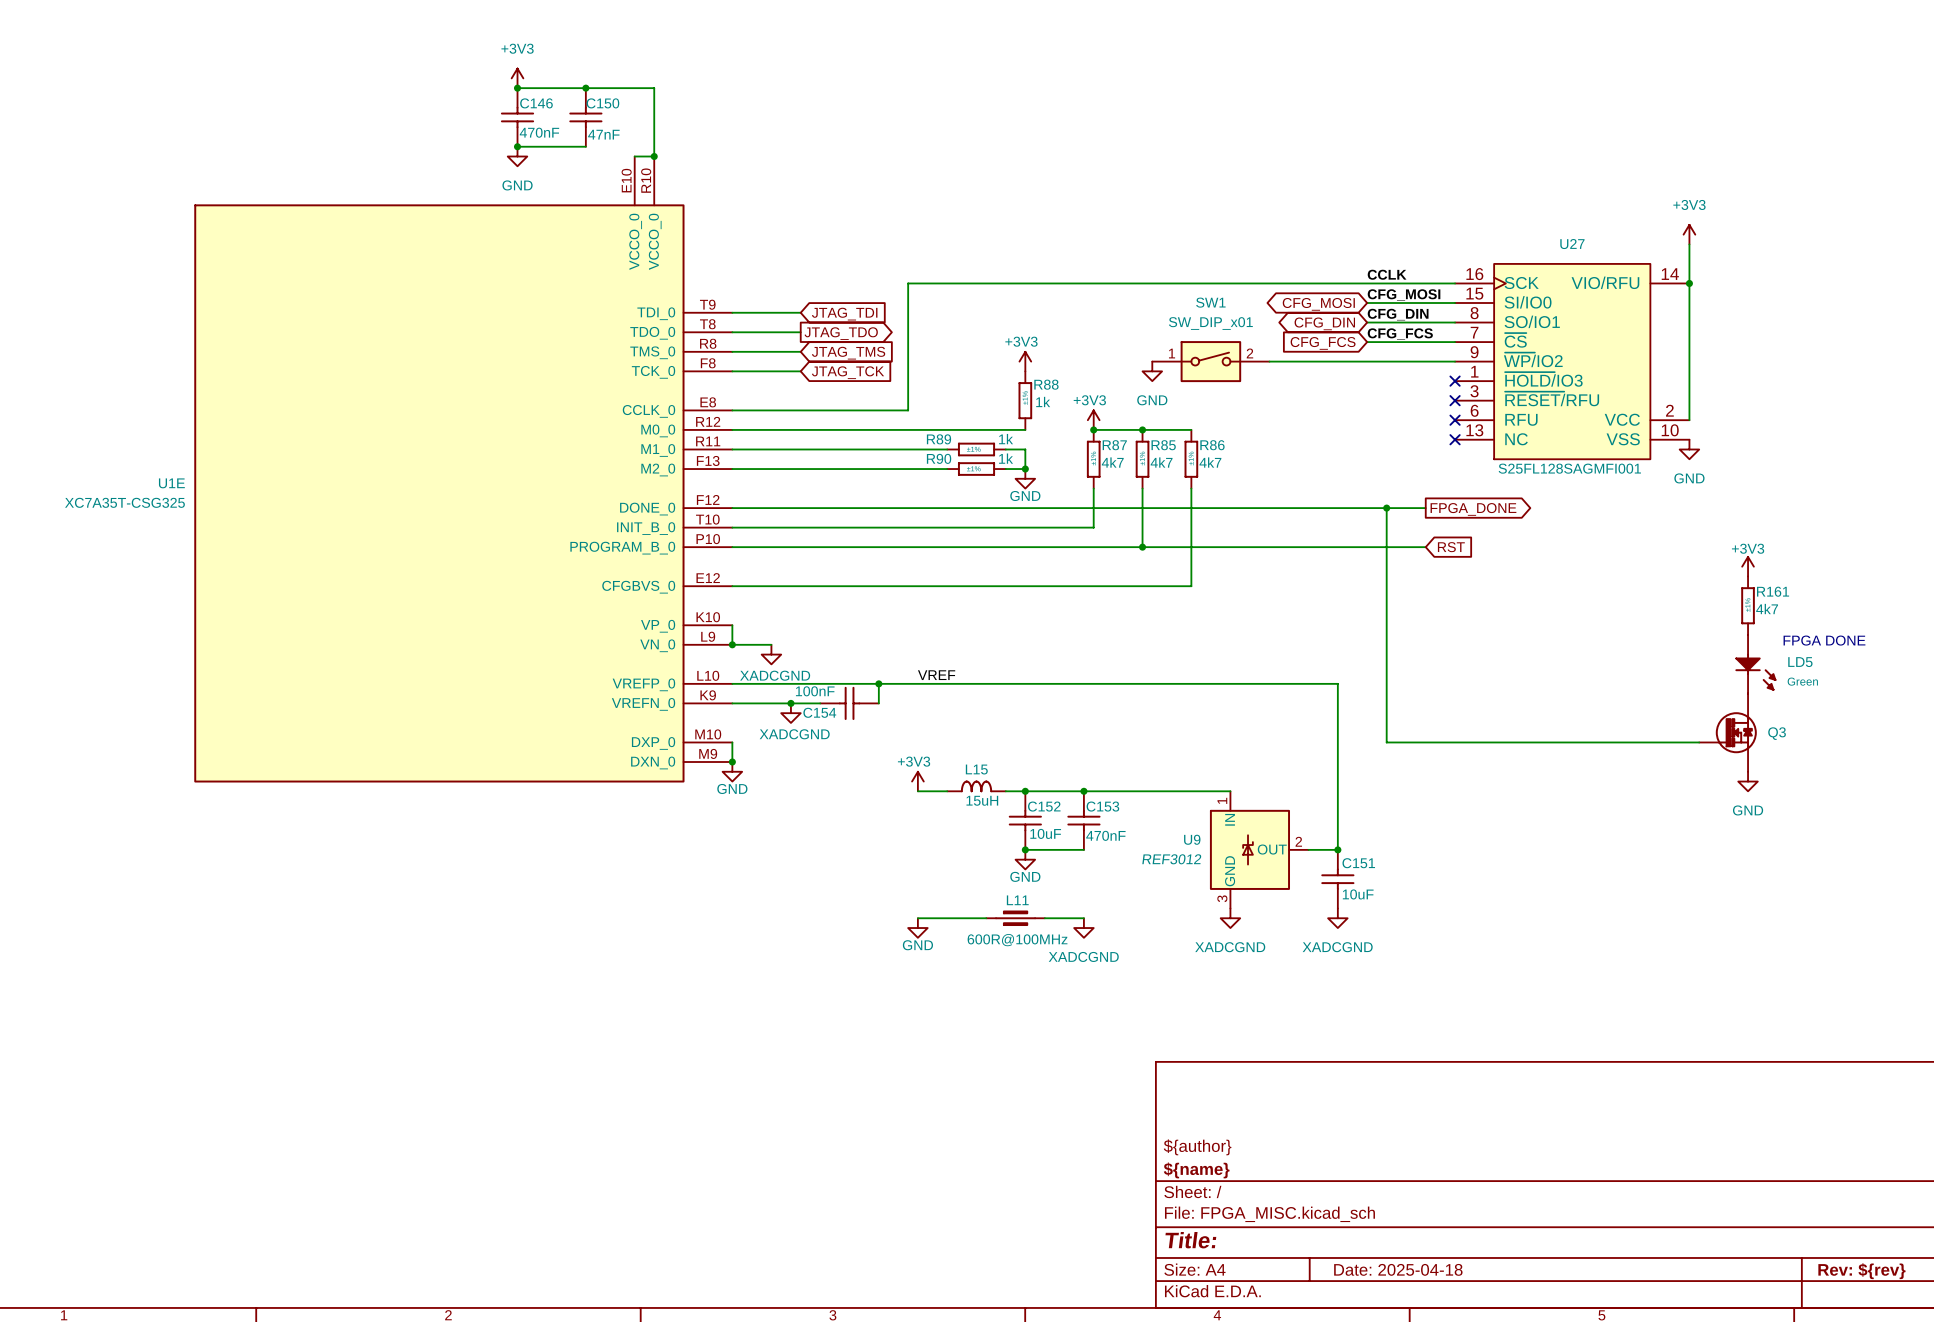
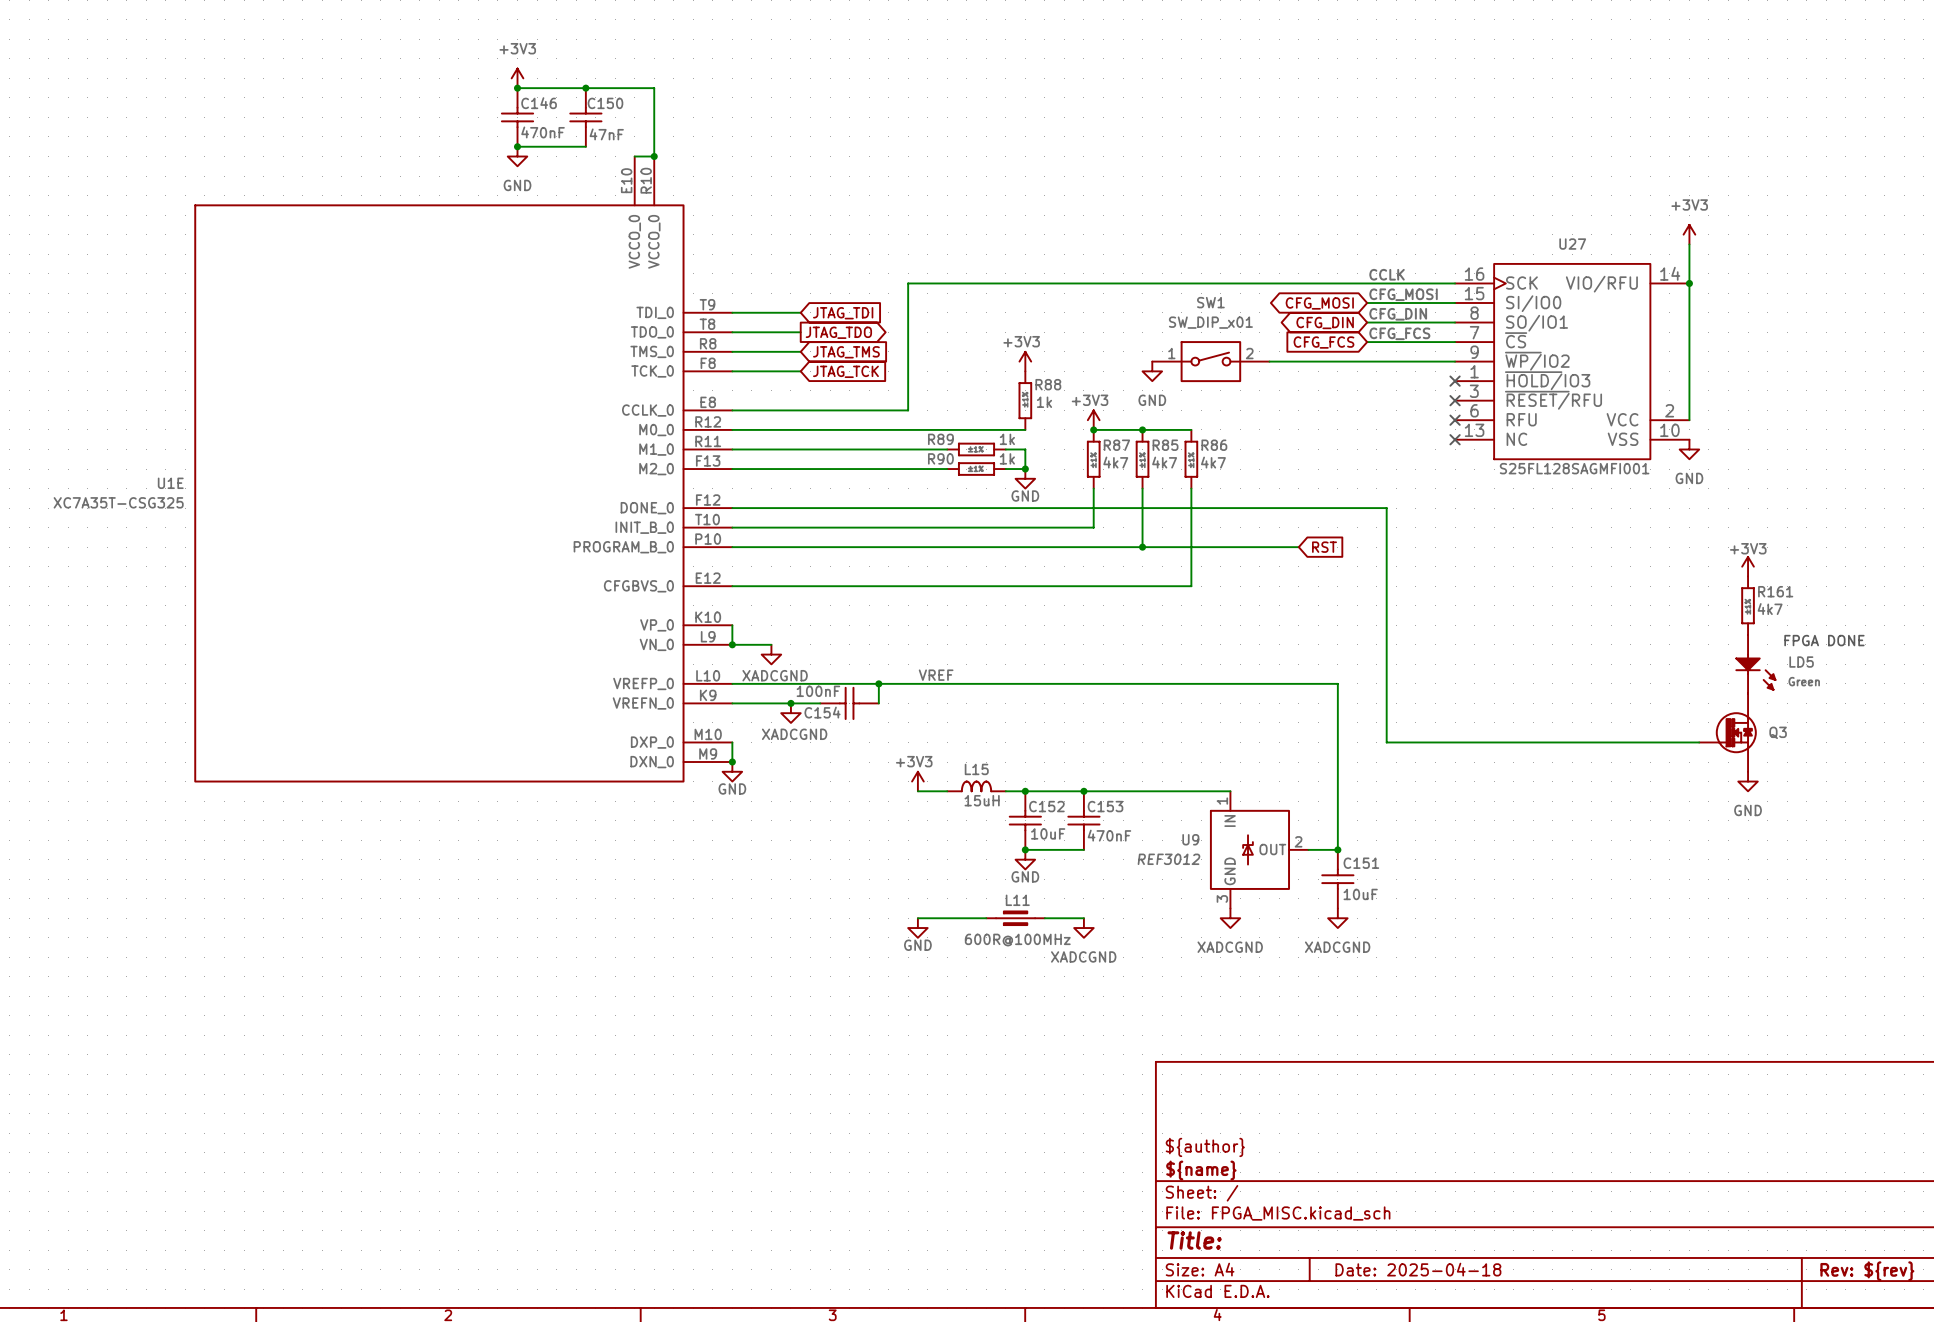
wire: (1386, 508) (1425, 508) -> none
junction: (1386, 508) -> none
global label: FPGA_DONE (1473, 509) -> none
wire: (1298, 547) (1425, 547) -> none
global label position: RST (1451, 547) -> RST (1324, 547)

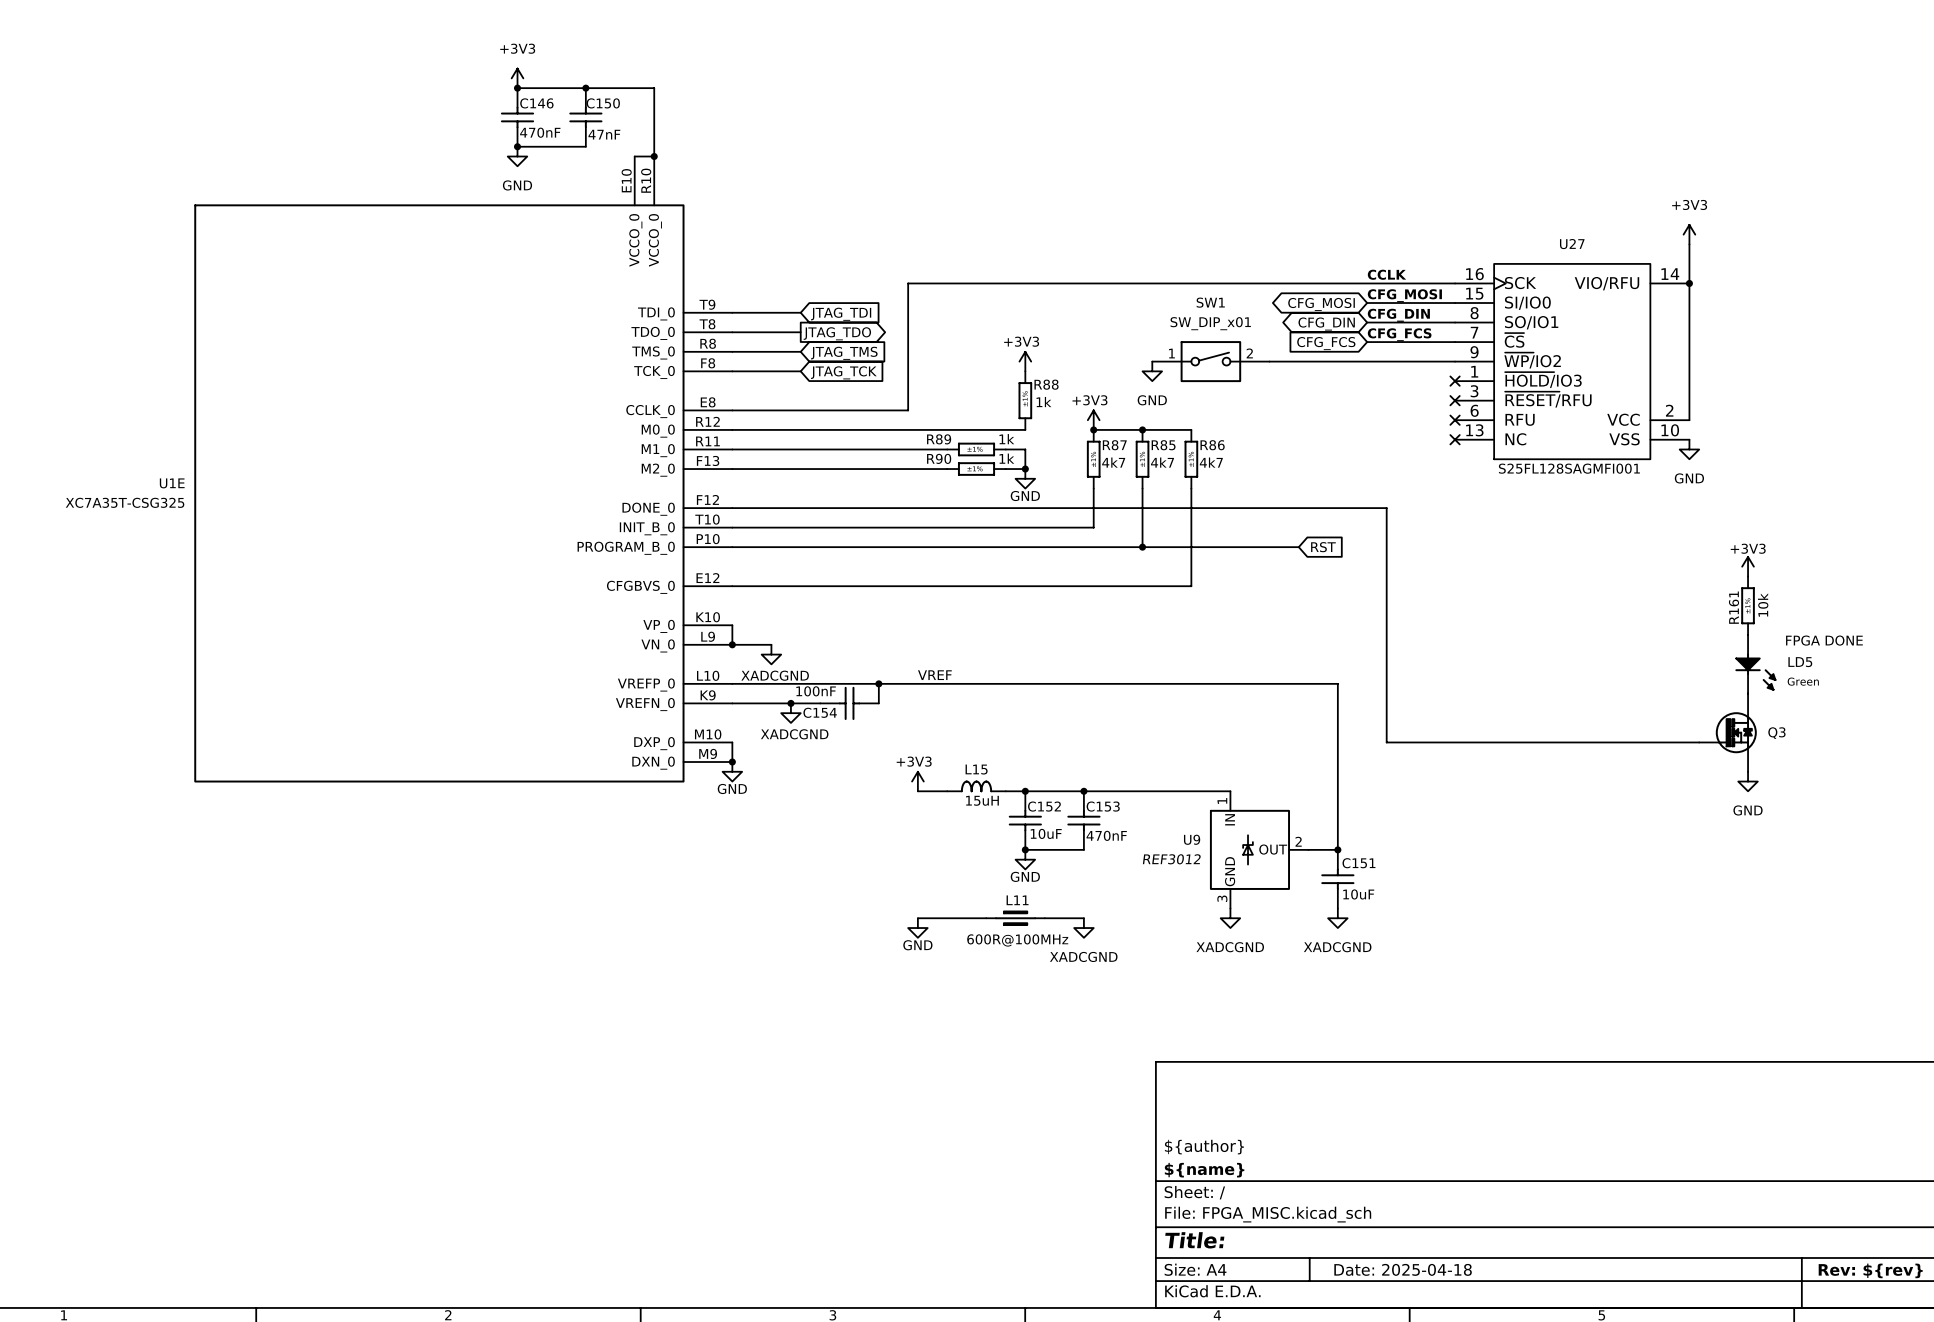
R161 name rotation: 0° (1775, 591) -> 90° counterclockwise (1734, 607)
R161 name position: R161 (1775, 591) -> R161 (1734, 607)
R161 text: 4k7 (1770, 609) -> 10k (1763, 605)

